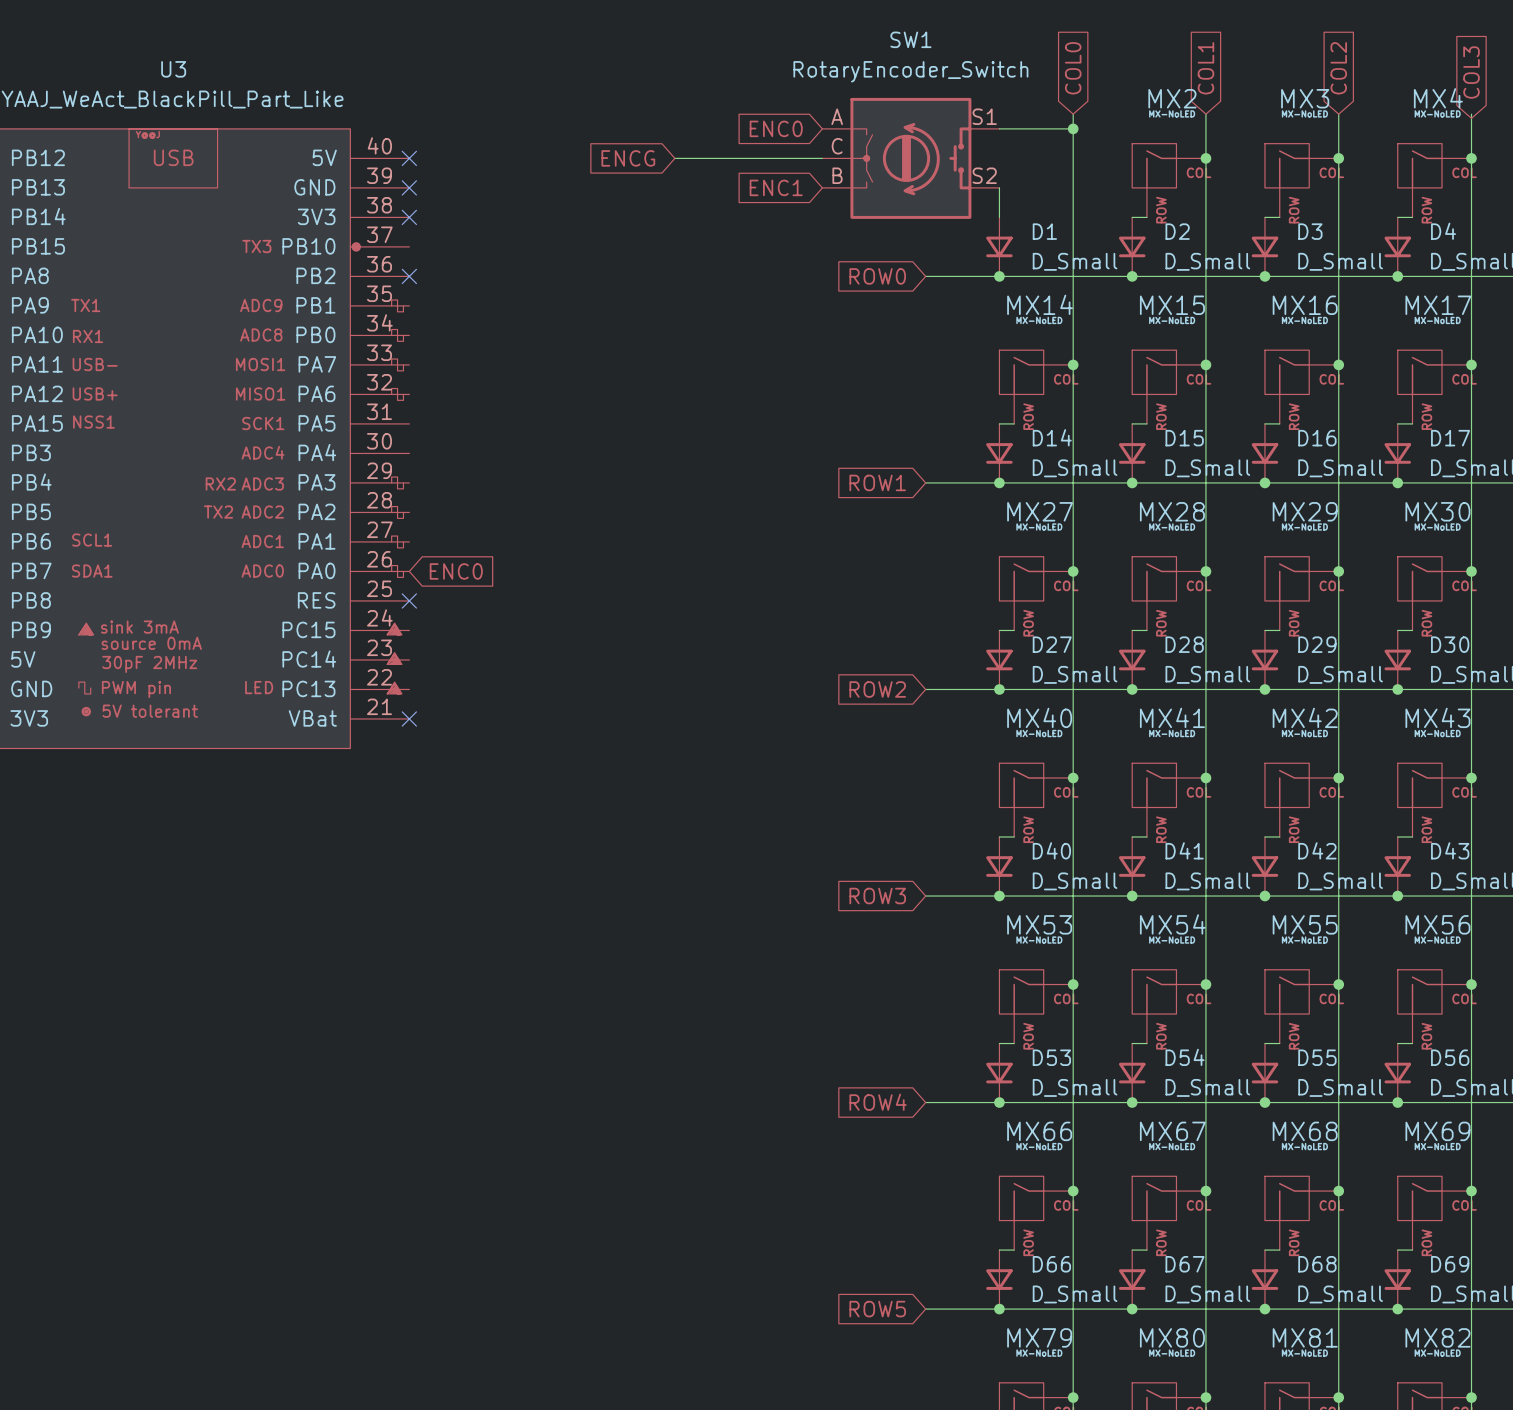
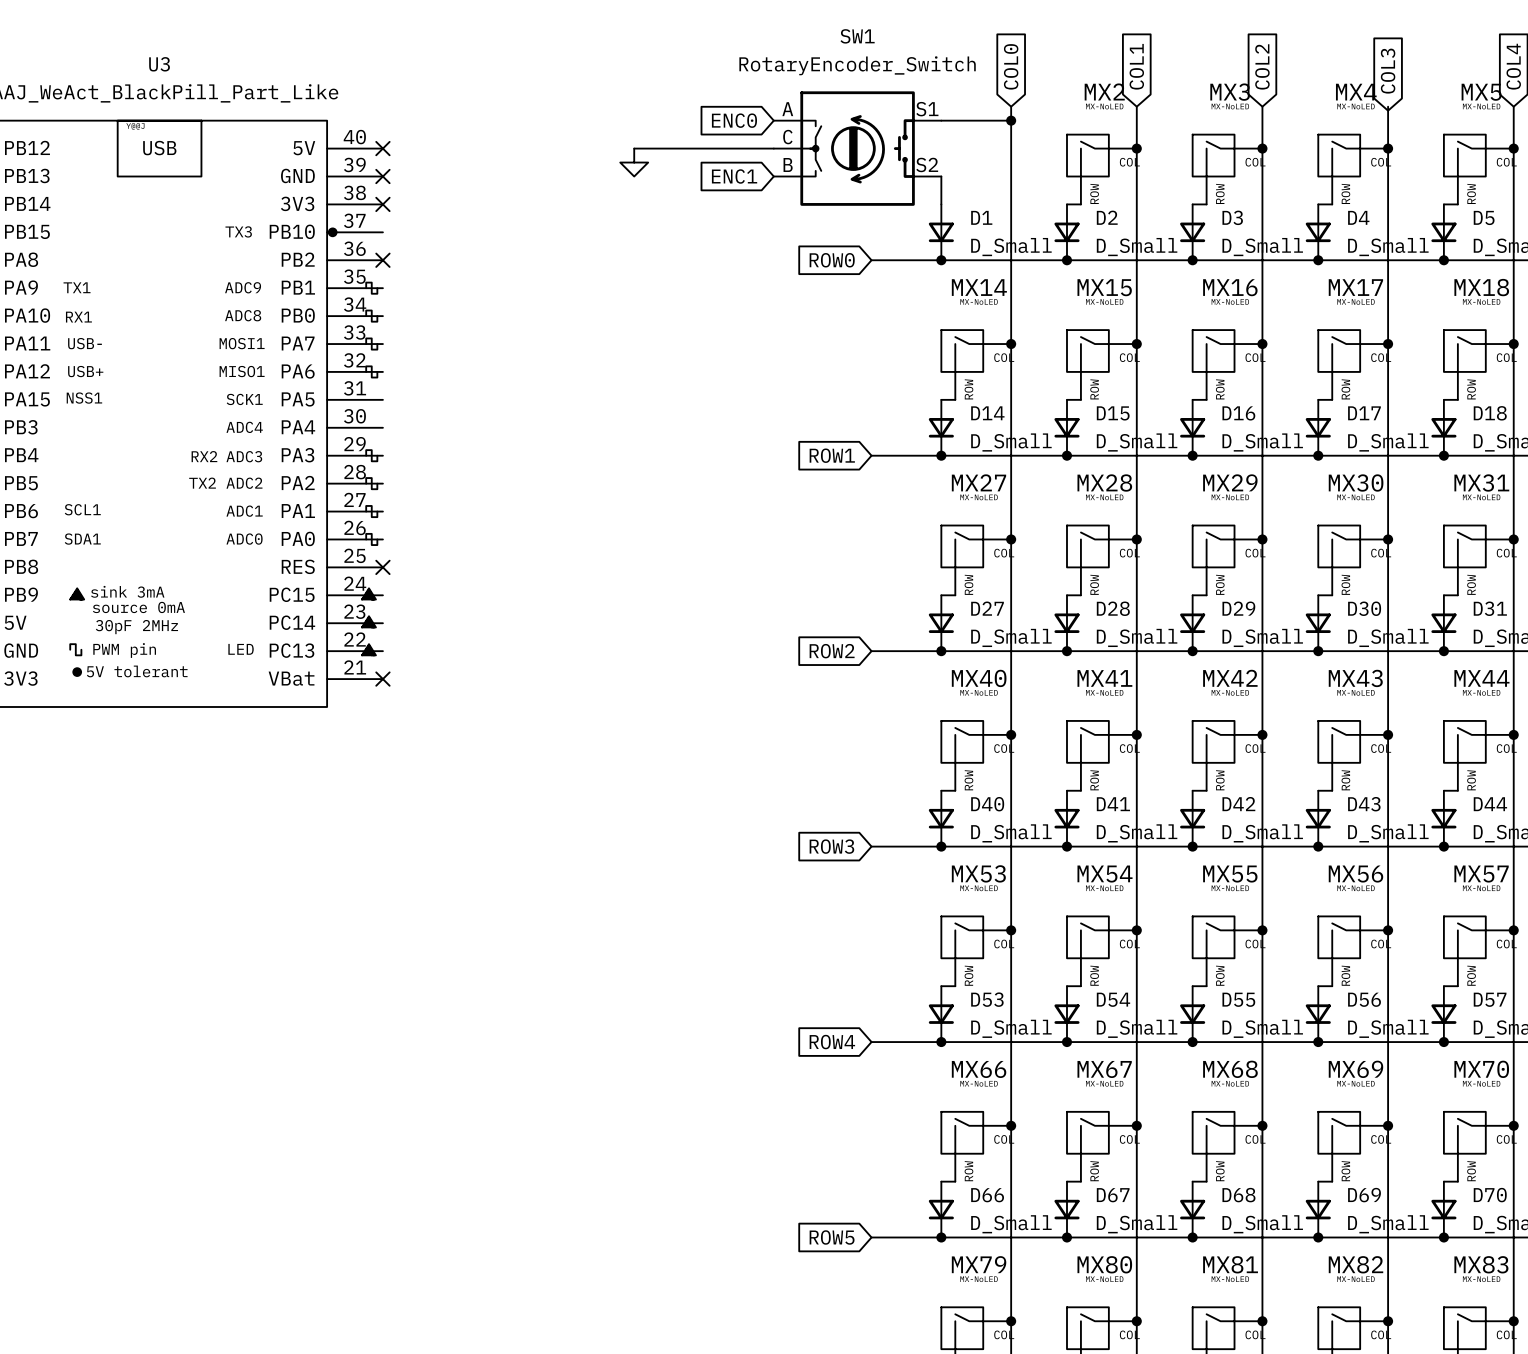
global label: ENCG (628, 158) -> none
power symbol: none -> (634, 162)
global label: ENC0 (456, 571) -> none

